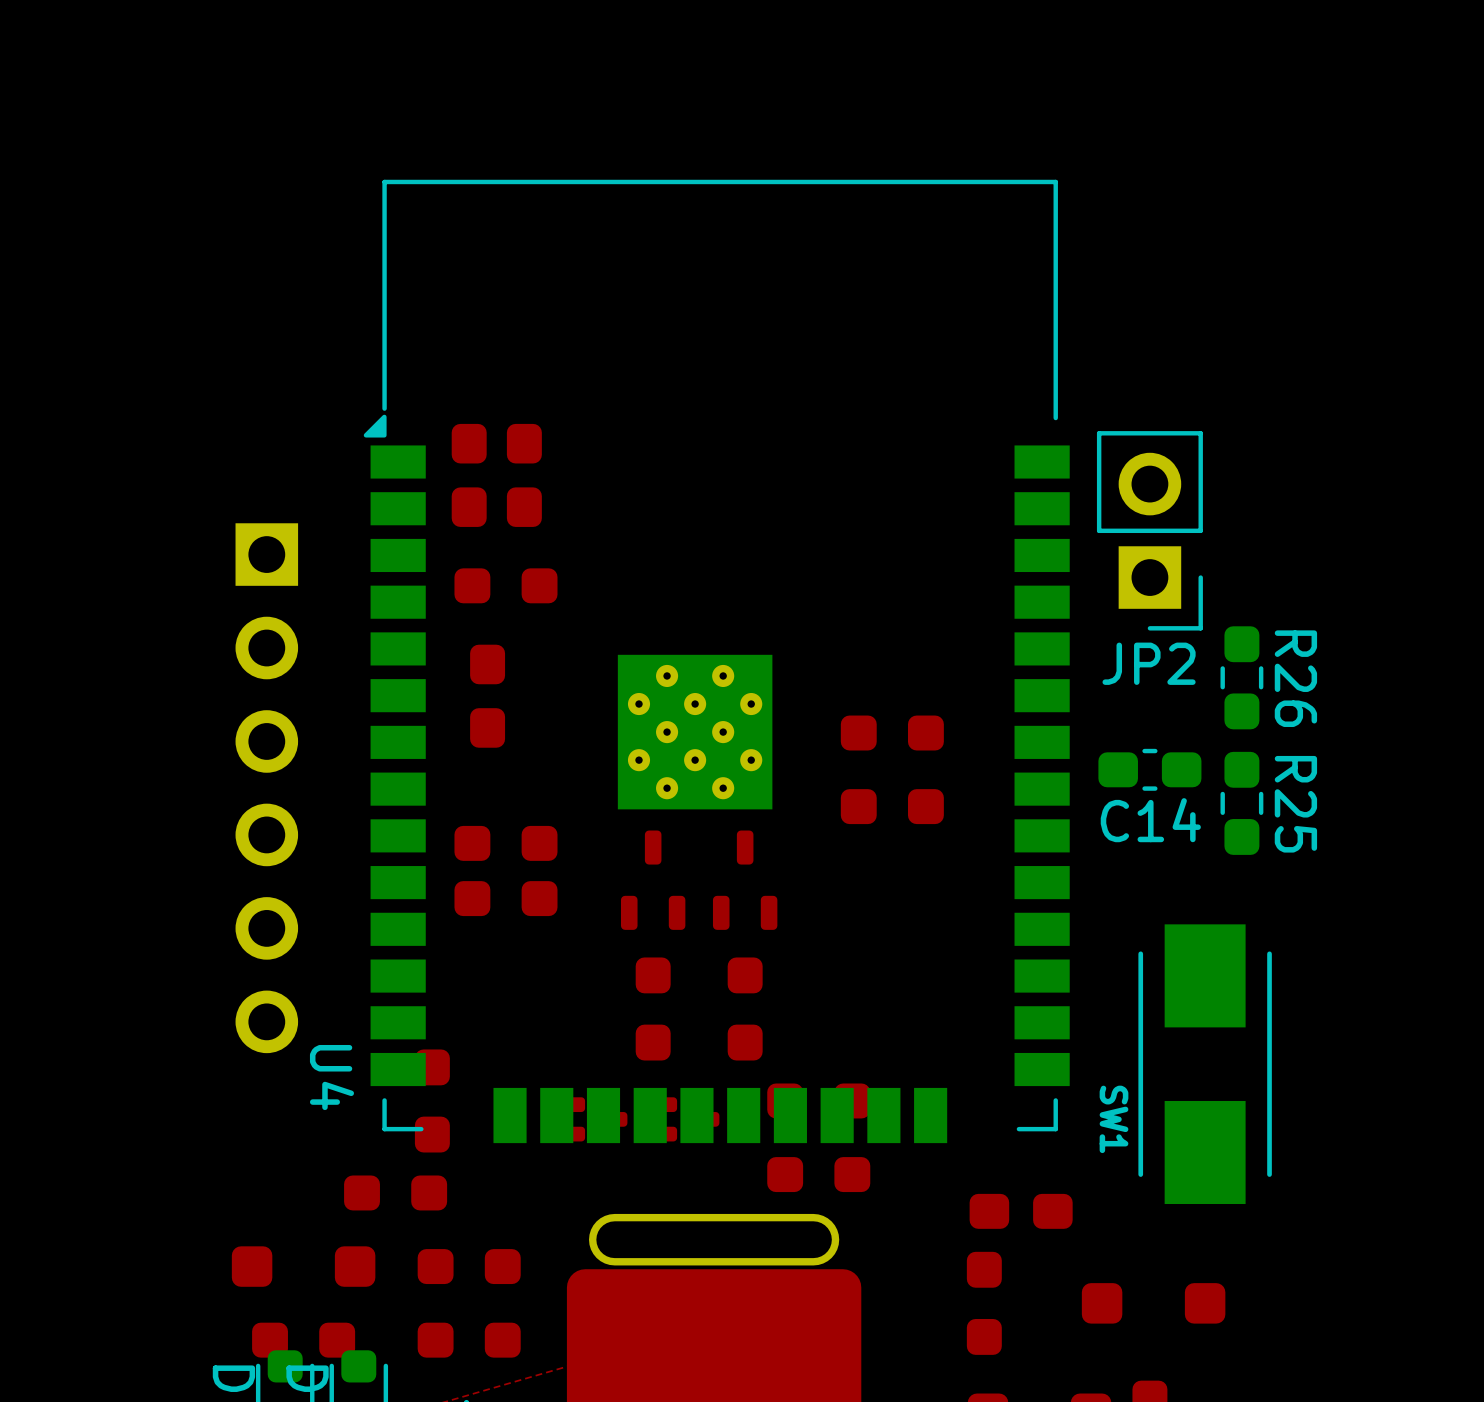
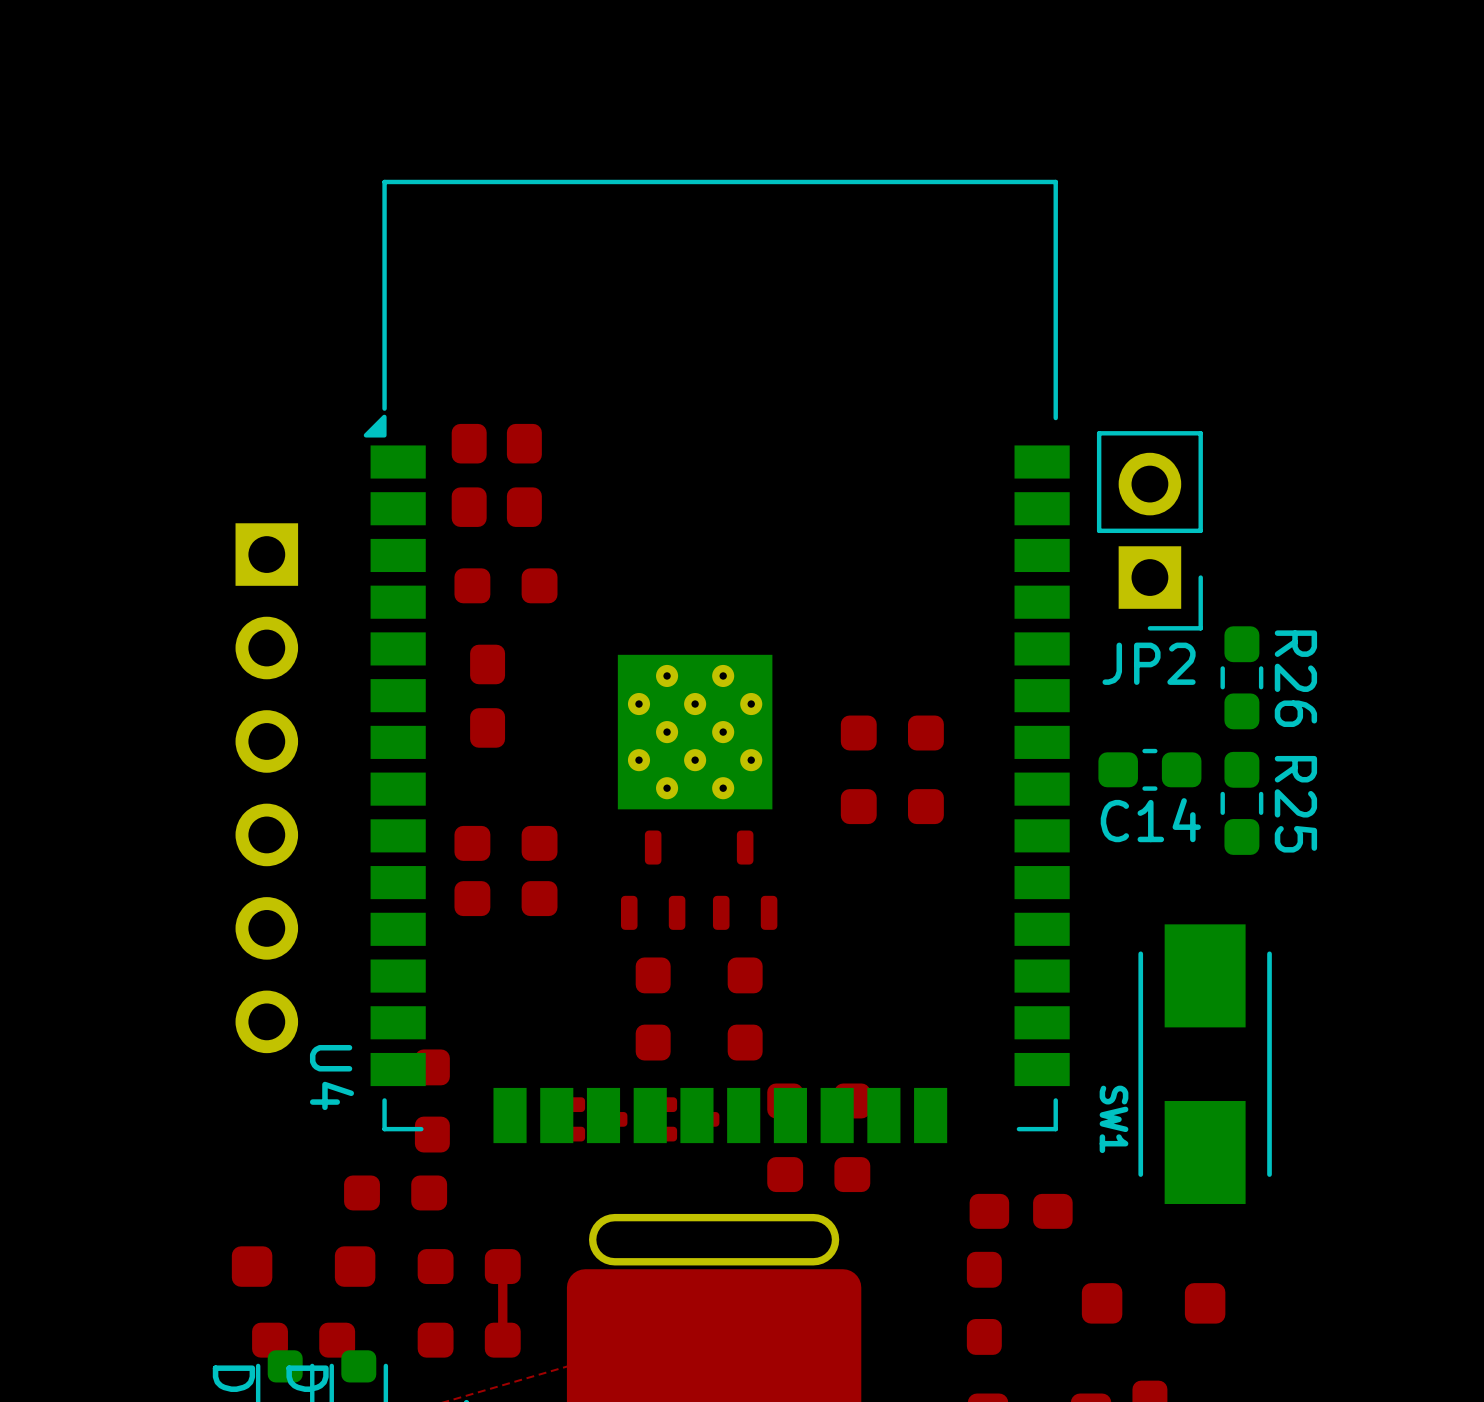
top track: none -> (502, 1266) (502, 1340)

